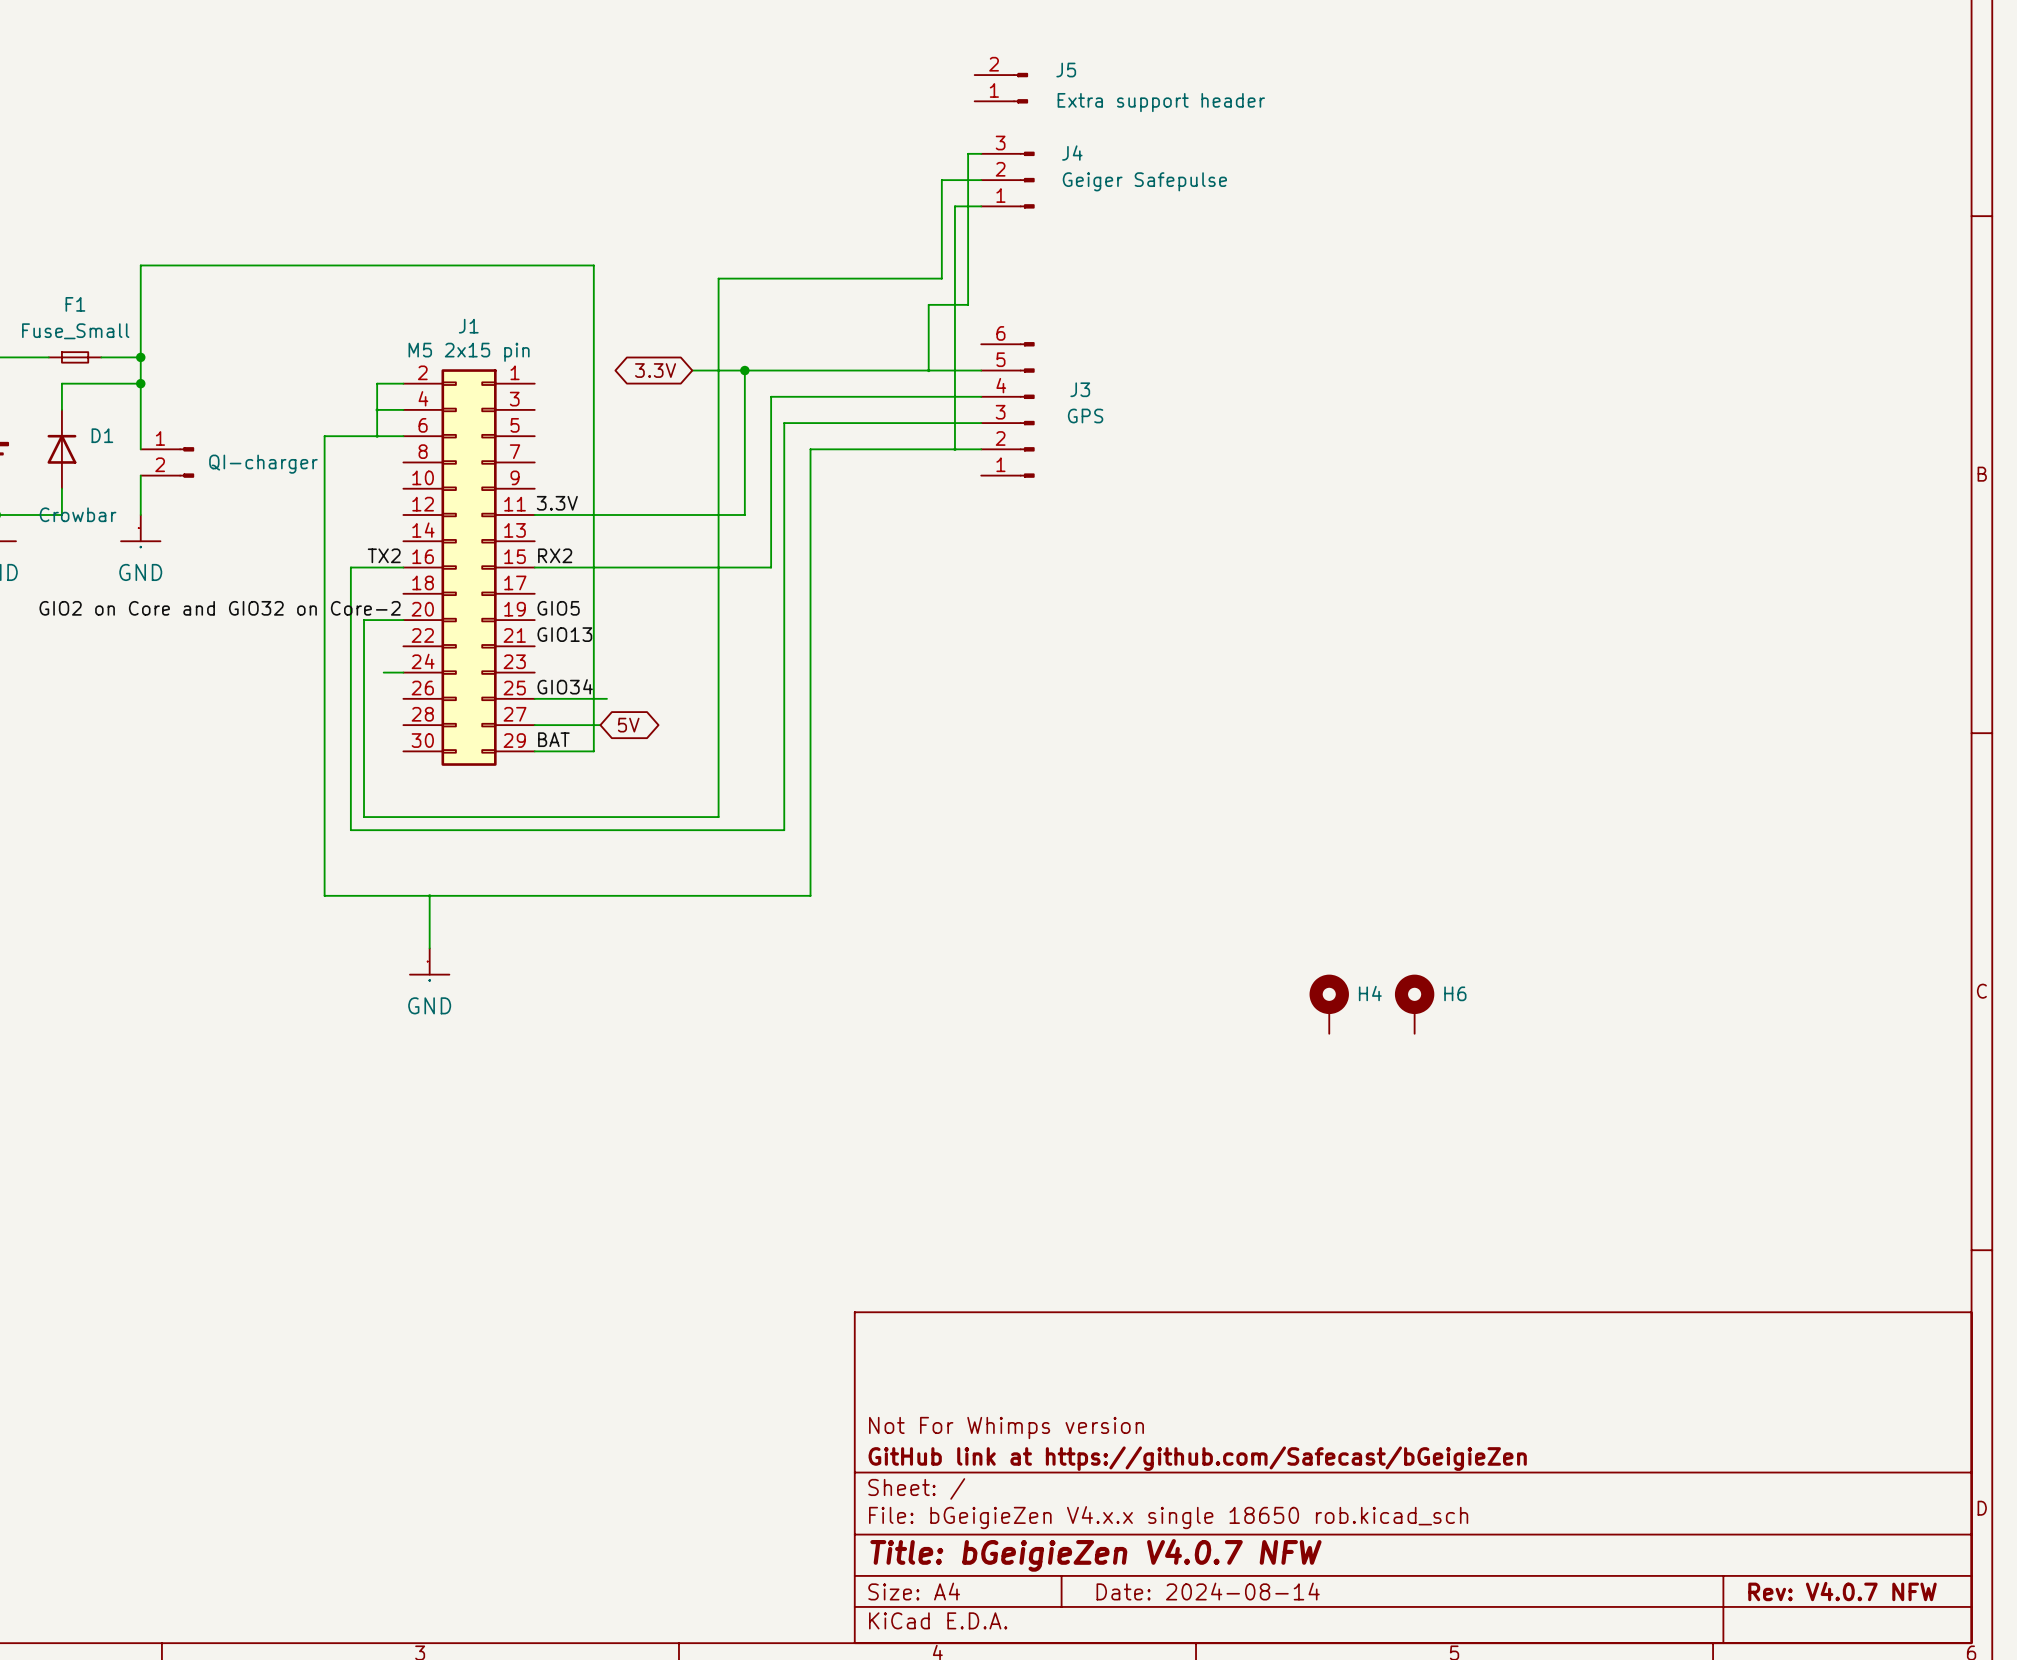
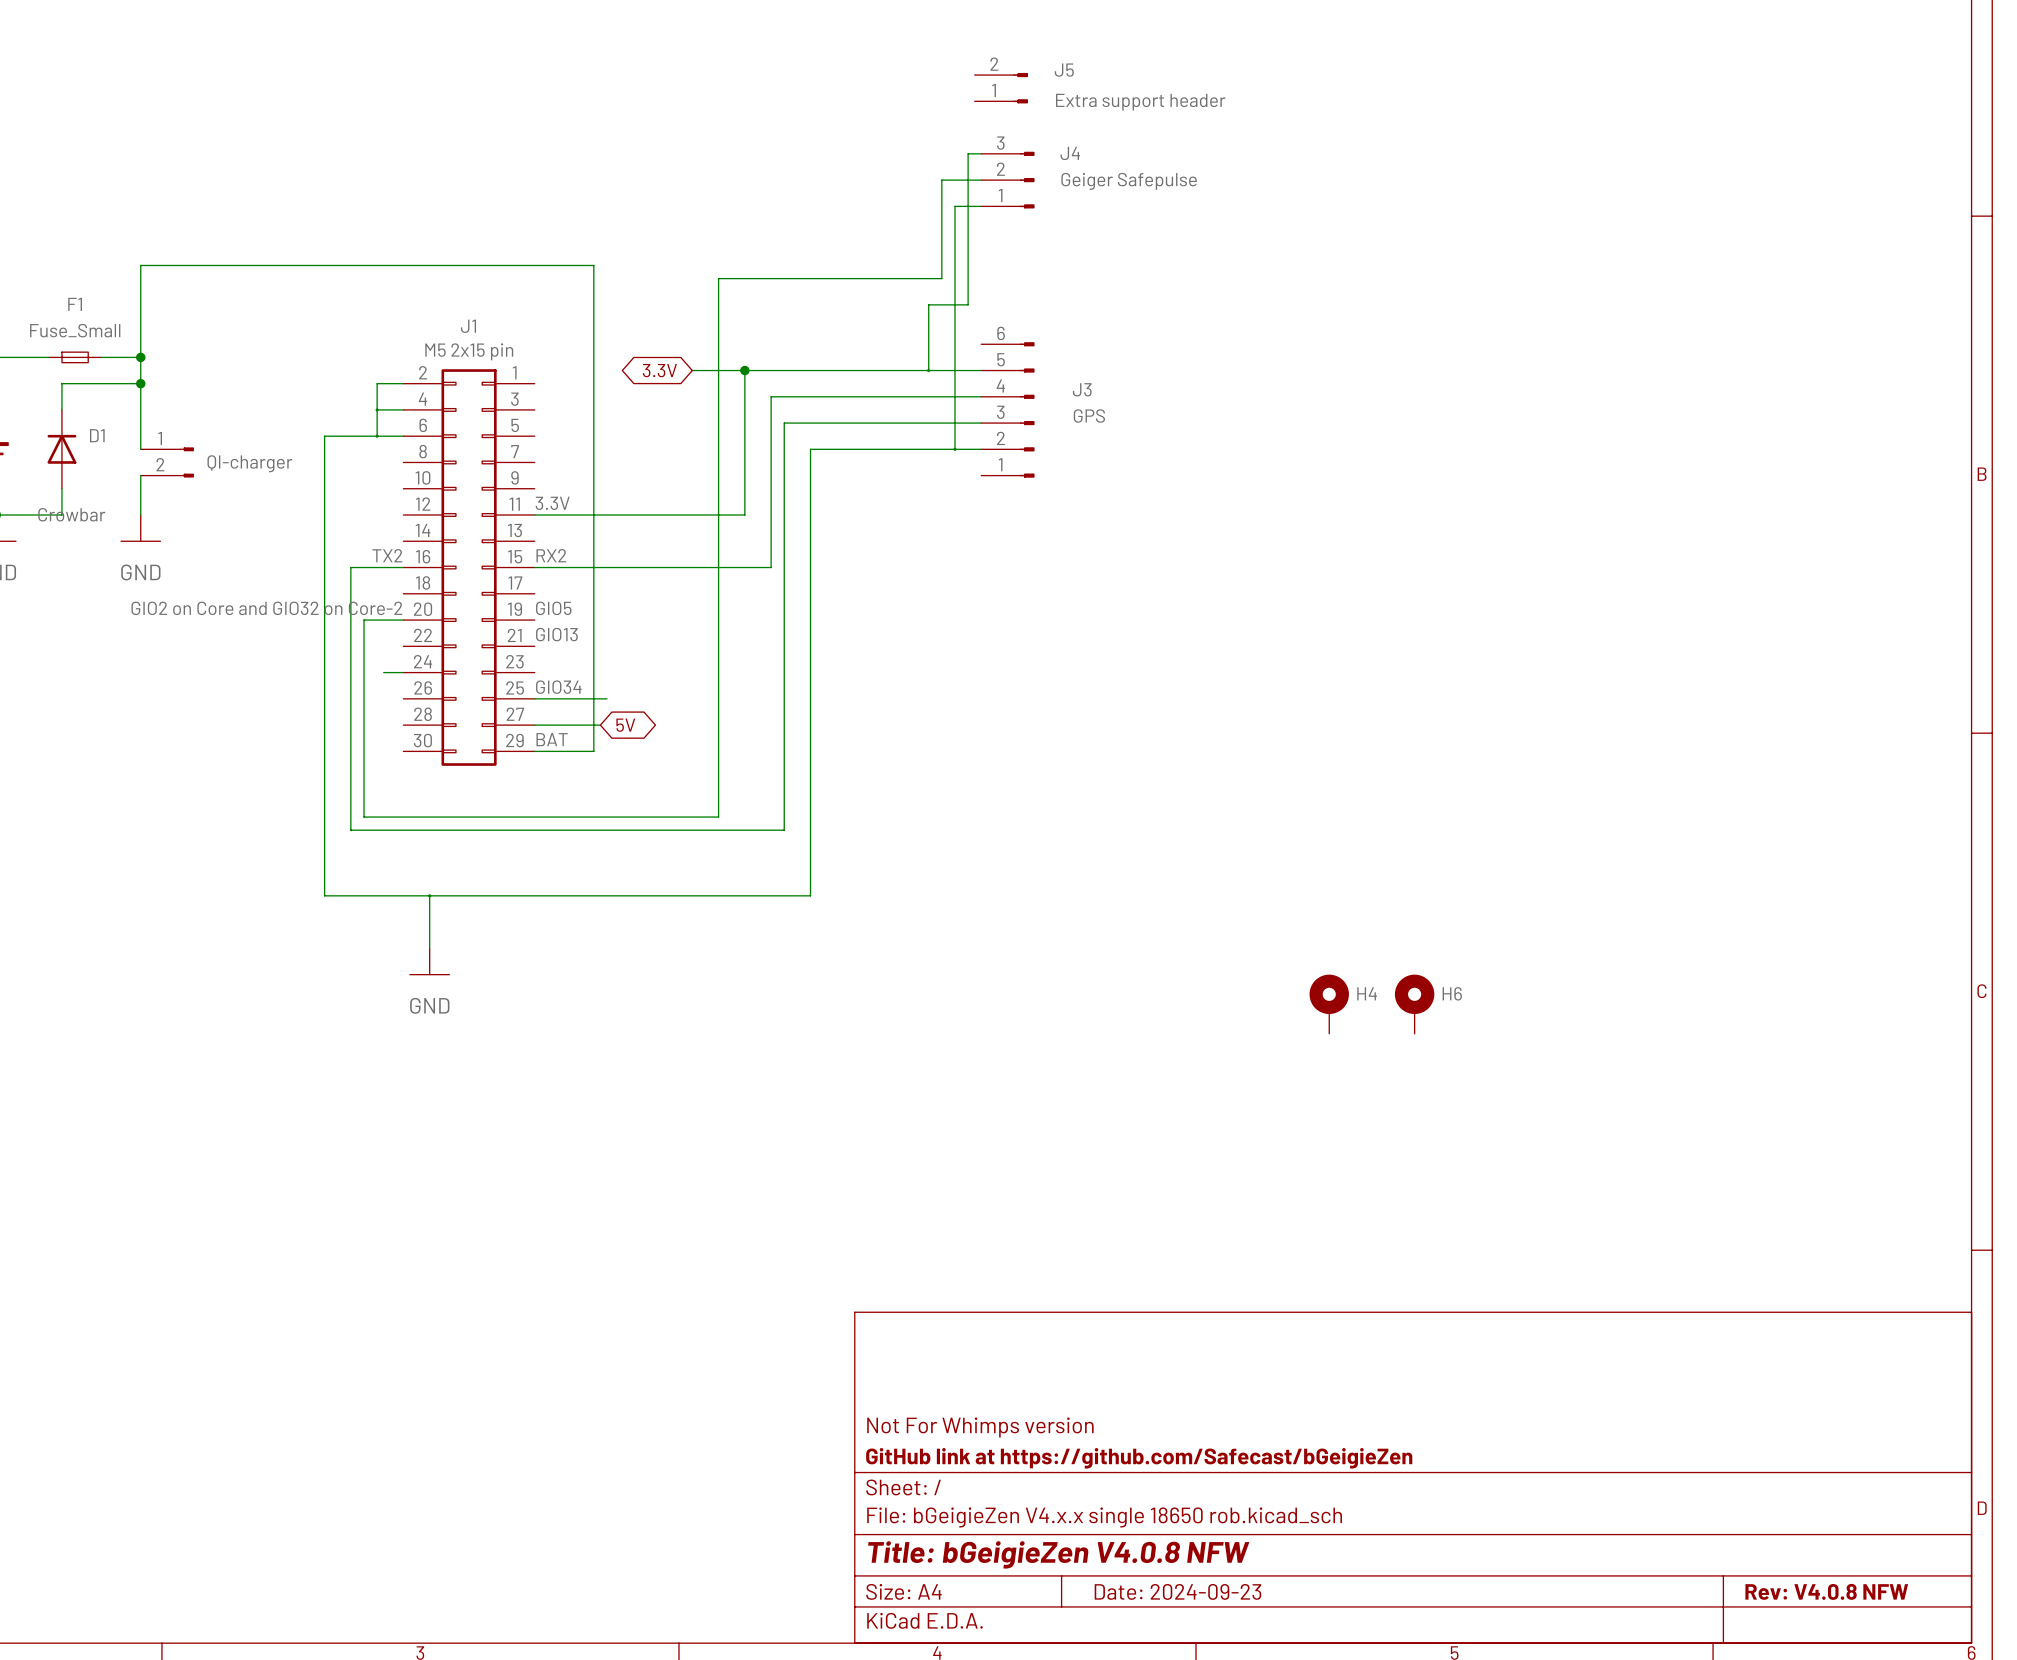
title block: Title: bGeigieZen V4.0.7 NFW (1095, 1555) -> Title: bGeigieZen V4.0.8 NFW (1058, 1554)
title block: Date: 2024-08-14 (1208, 1591) -> Date: 2024-09-23 (1178, 1591)
title block: Rev: V4.0.7 NFW (1842, 1591) -> Rev: V4.0.8 NFW (1826, 1591)

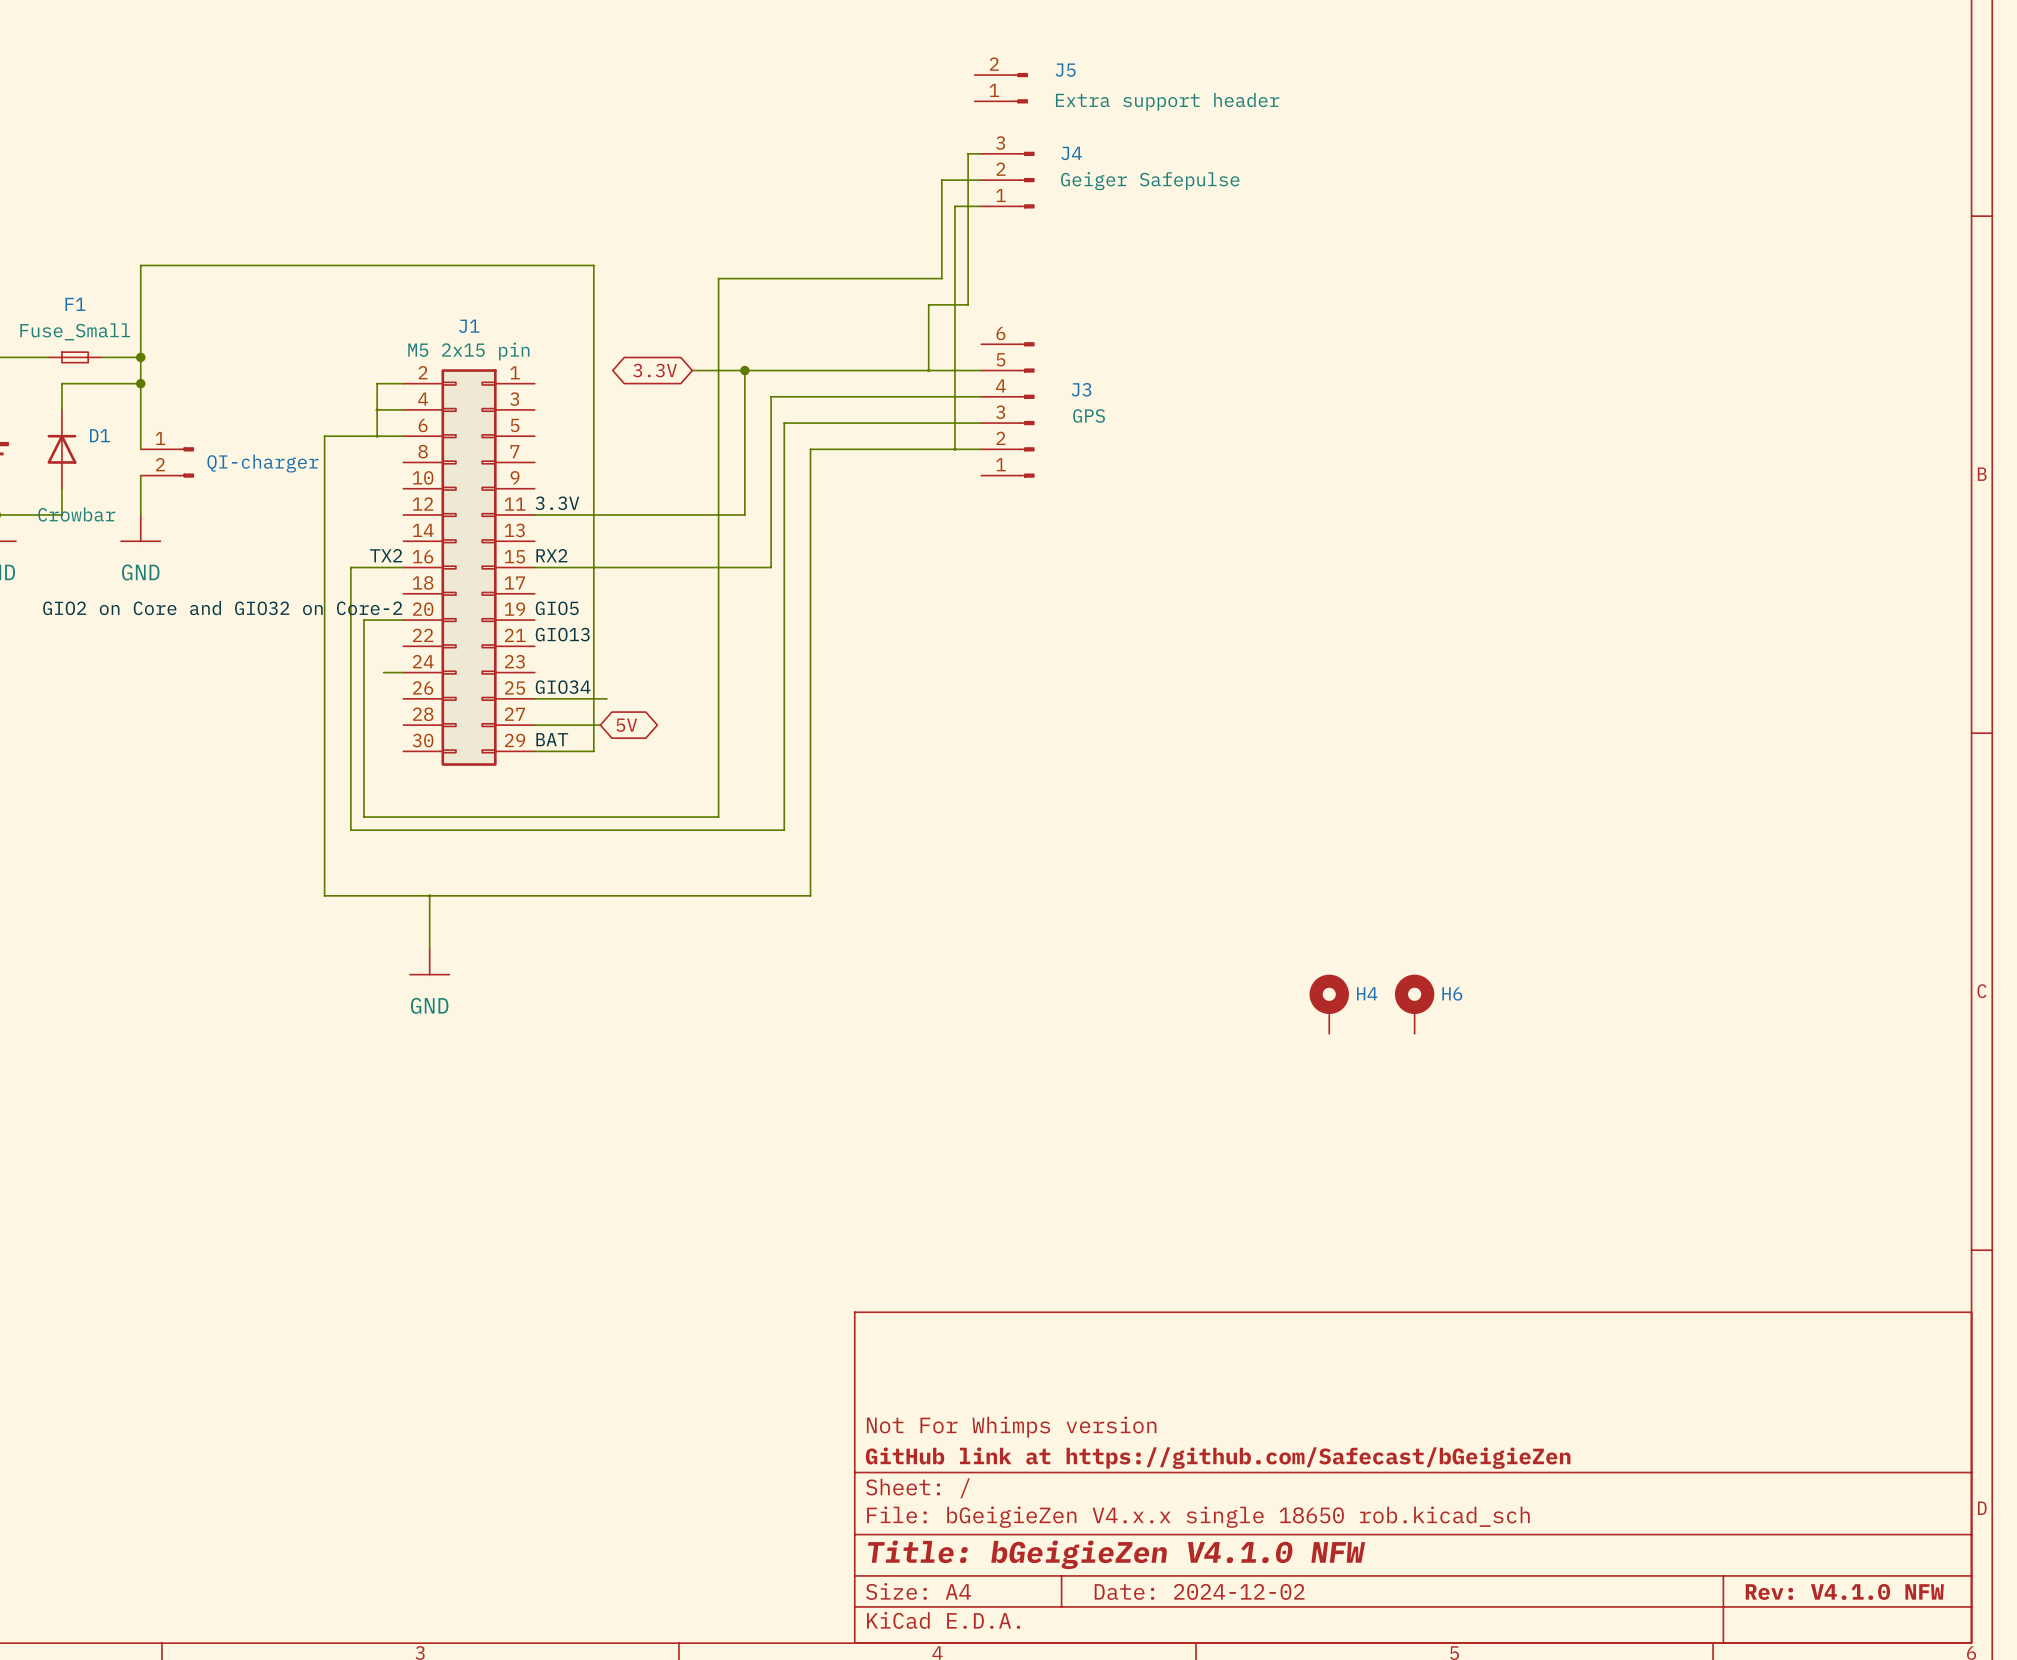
title block: Title: bGeigieZen V4.0.8 NFW (1058, 1554) -> Title: bGeigieZen V4.1.0 NFW (1116, 1554)
title block: Date: 2024-09-23 (1178, 1591) -> Date: 2024-12-02 (1199, 1591)
title block: Rev: V4.0.8 NFW (1826, 1591) -> Rev: V4.1.0 NFW (1844, 1591)

